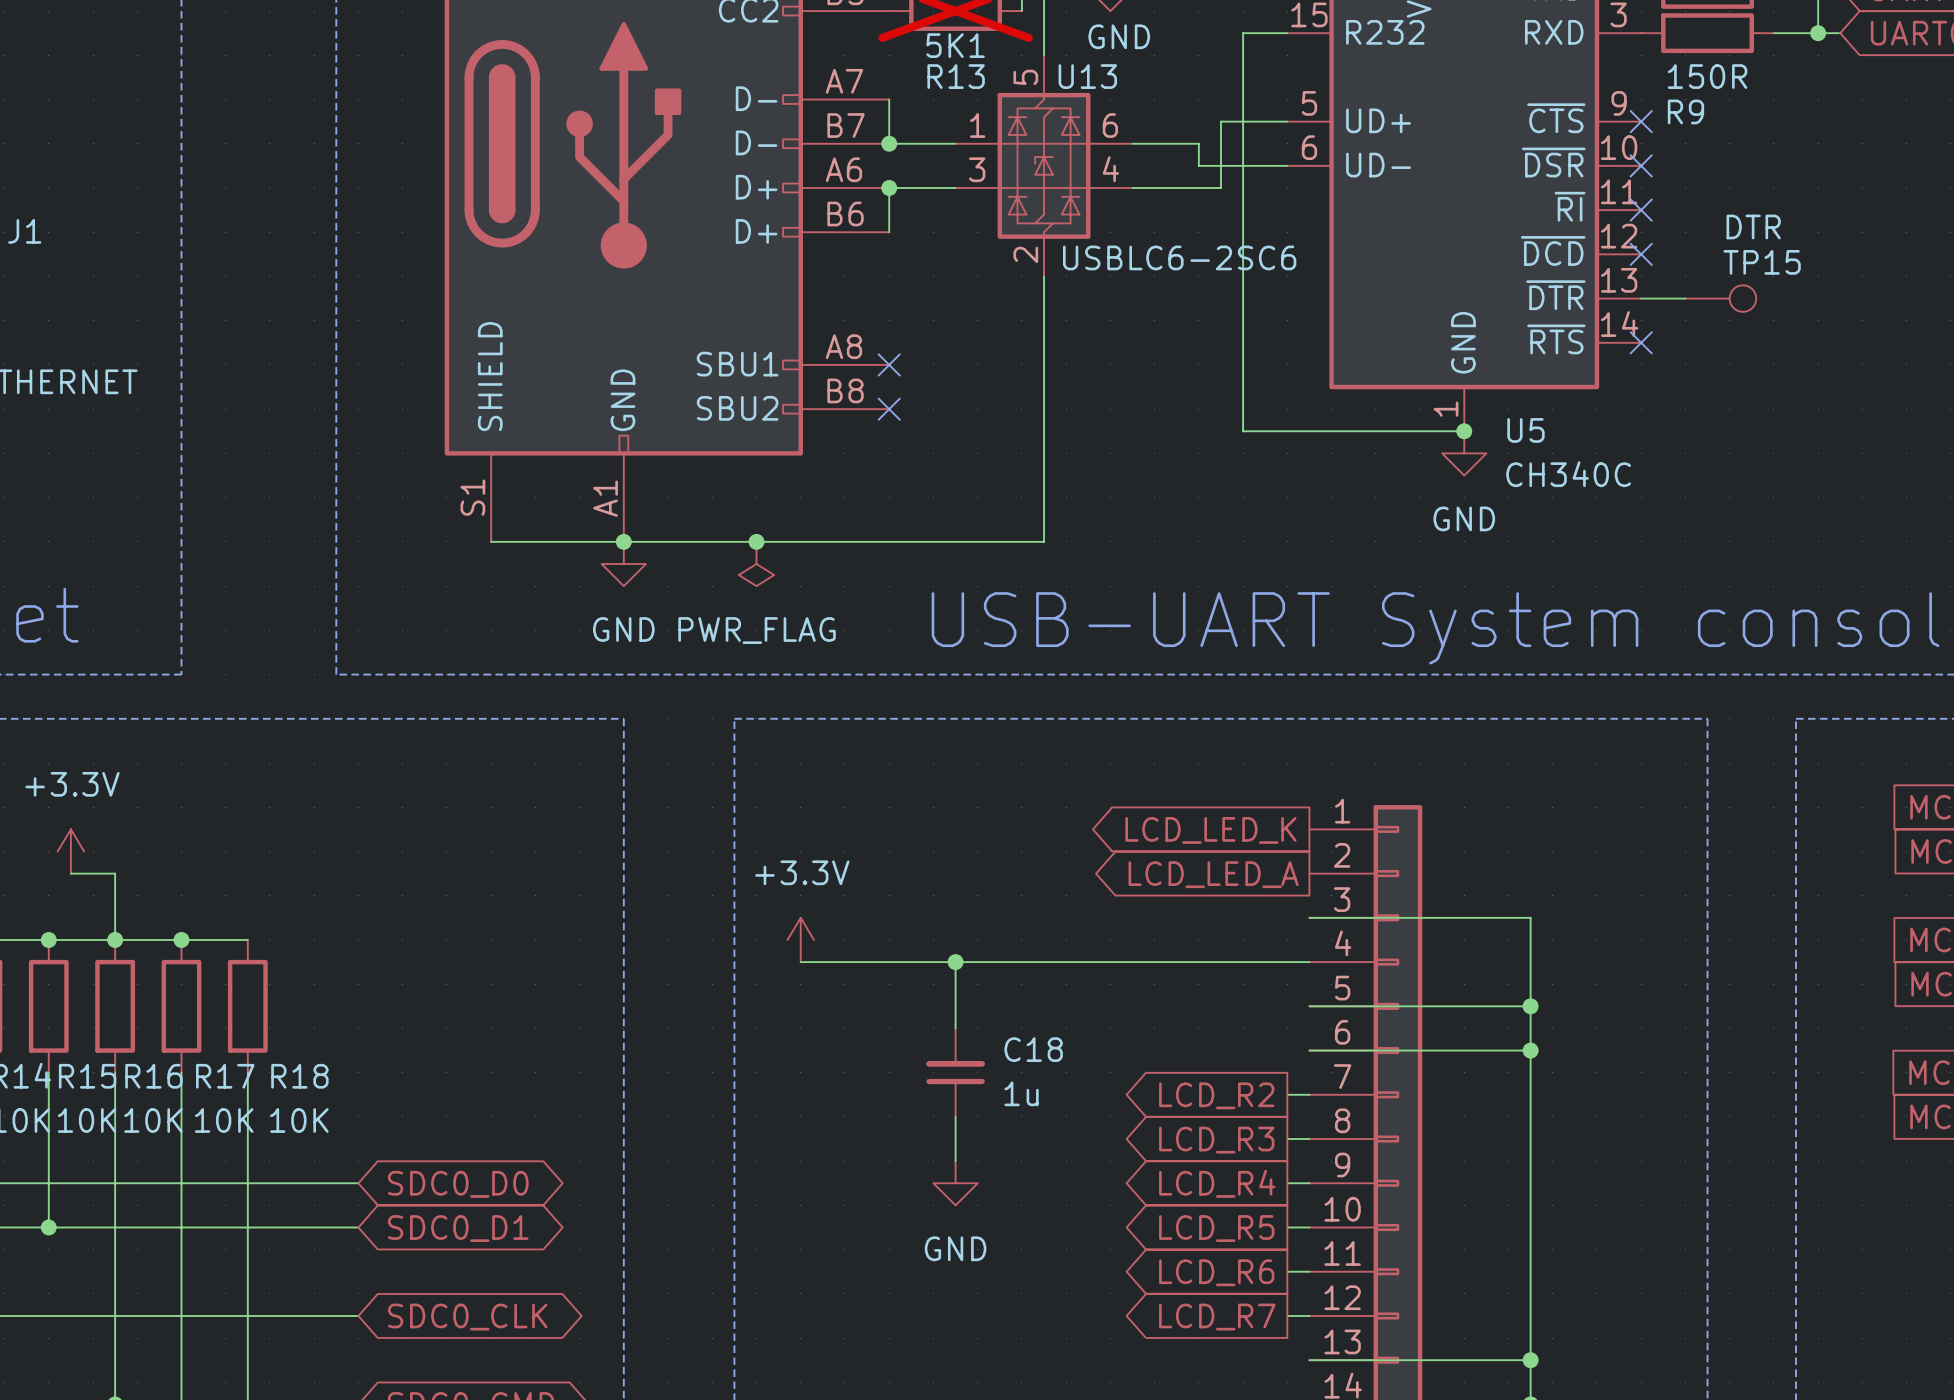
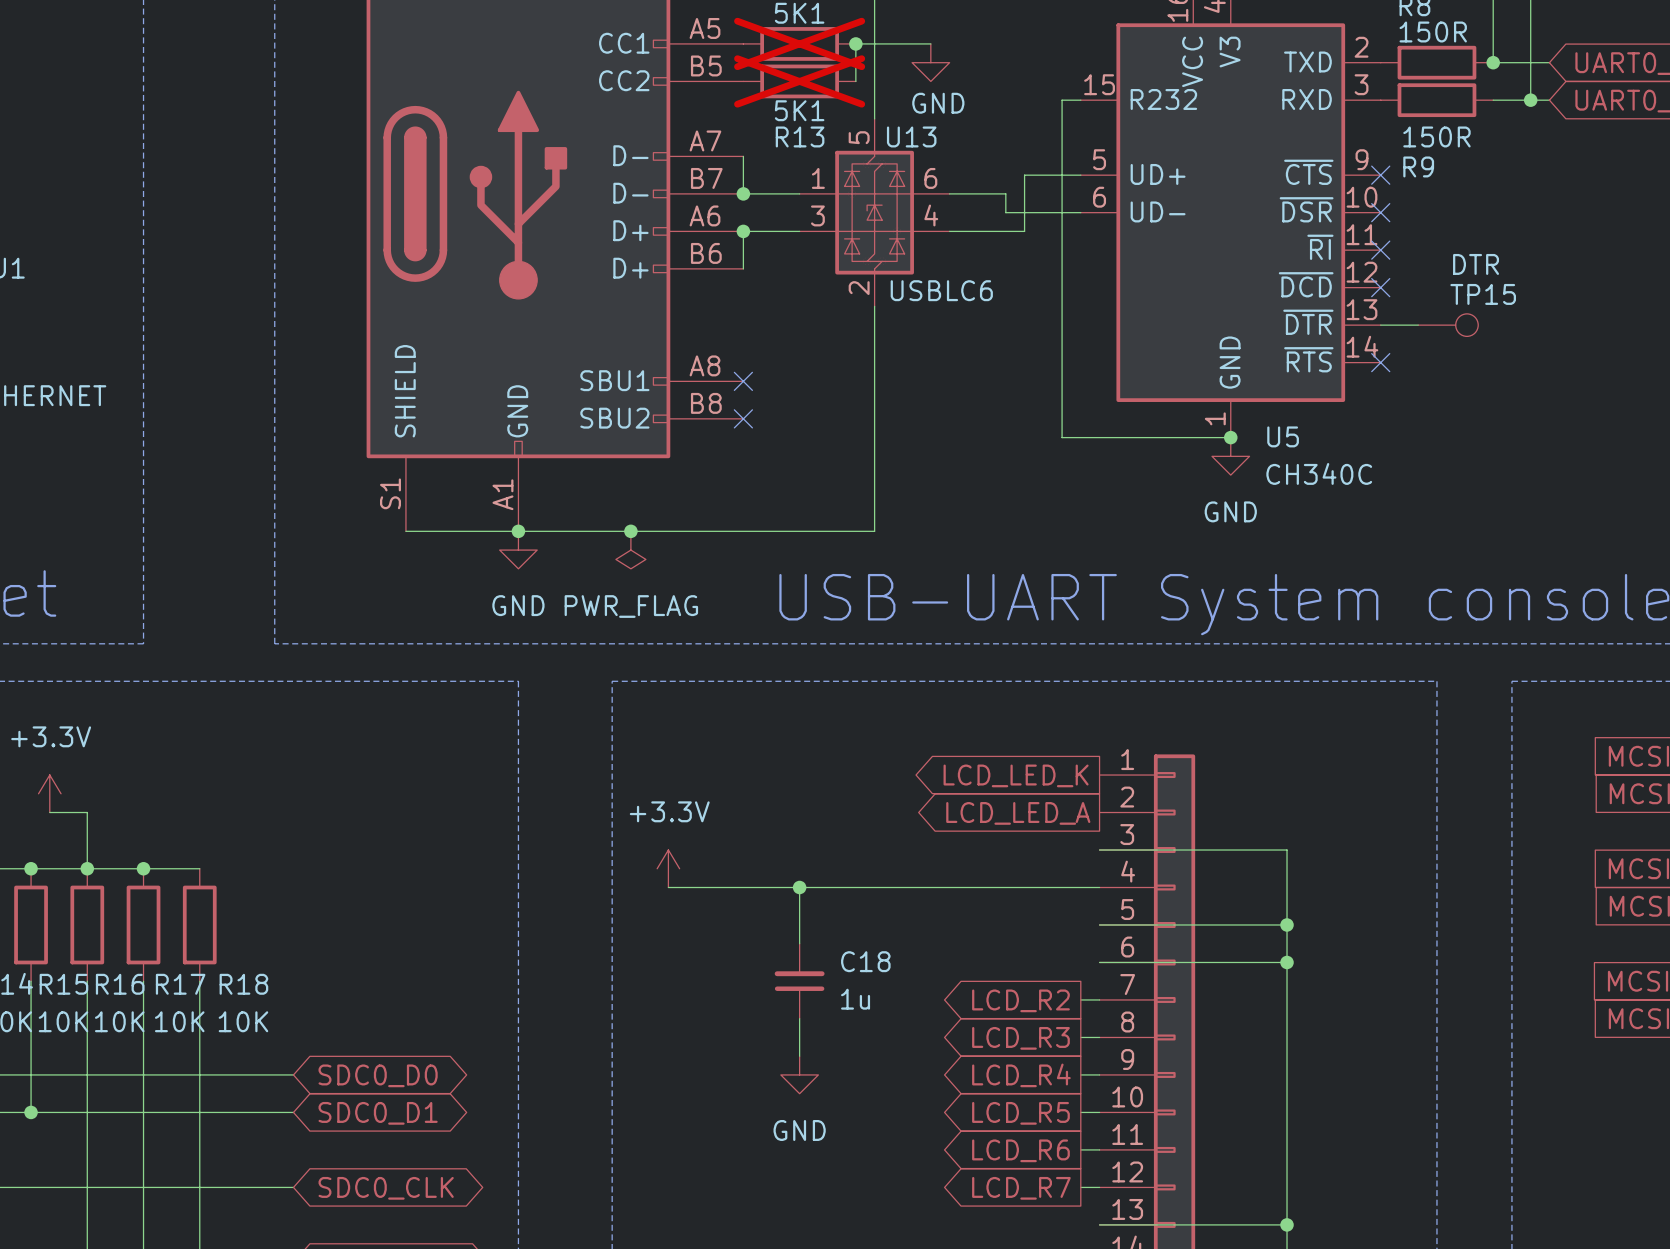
wire: (1265, 33) (1243, 33) (1243, 431) (1265, 431) -> (1062, 100) (1062, 437)
U13 value: USBLC6-2SC6 (1179, 257) -> USBLC6 (941, 290)

